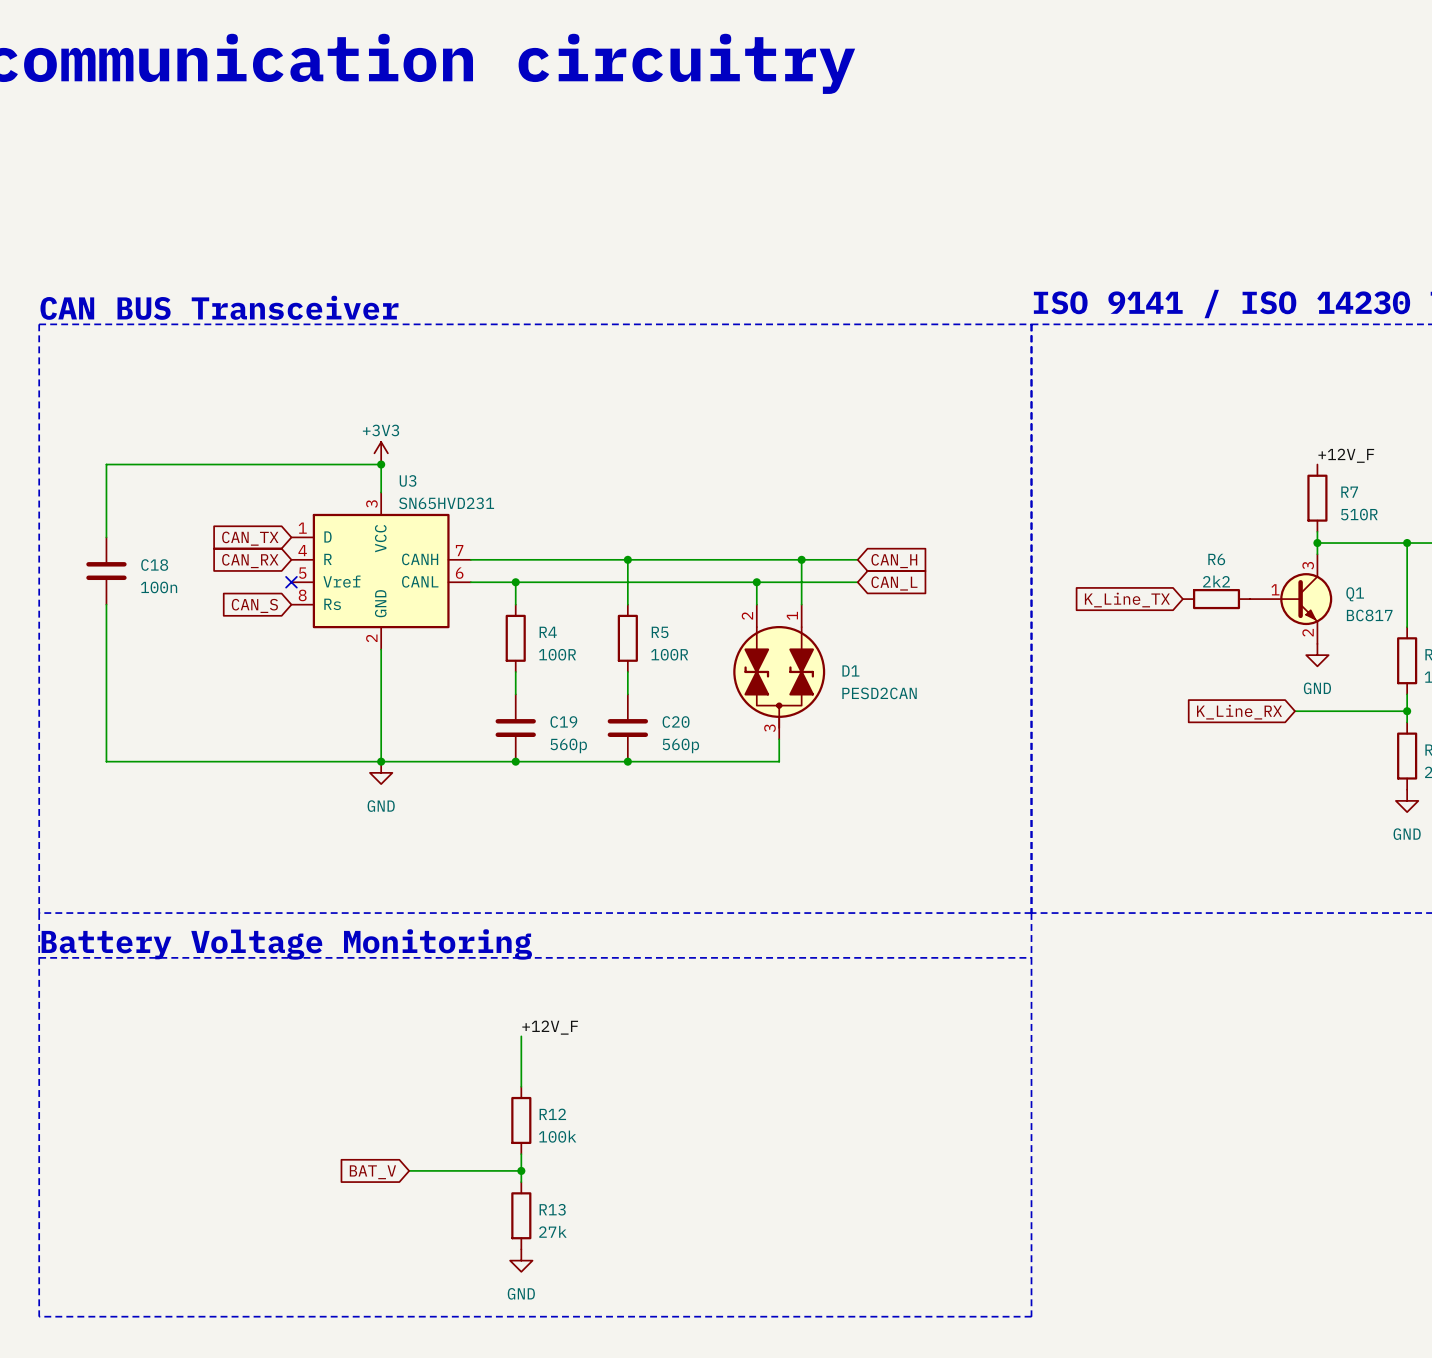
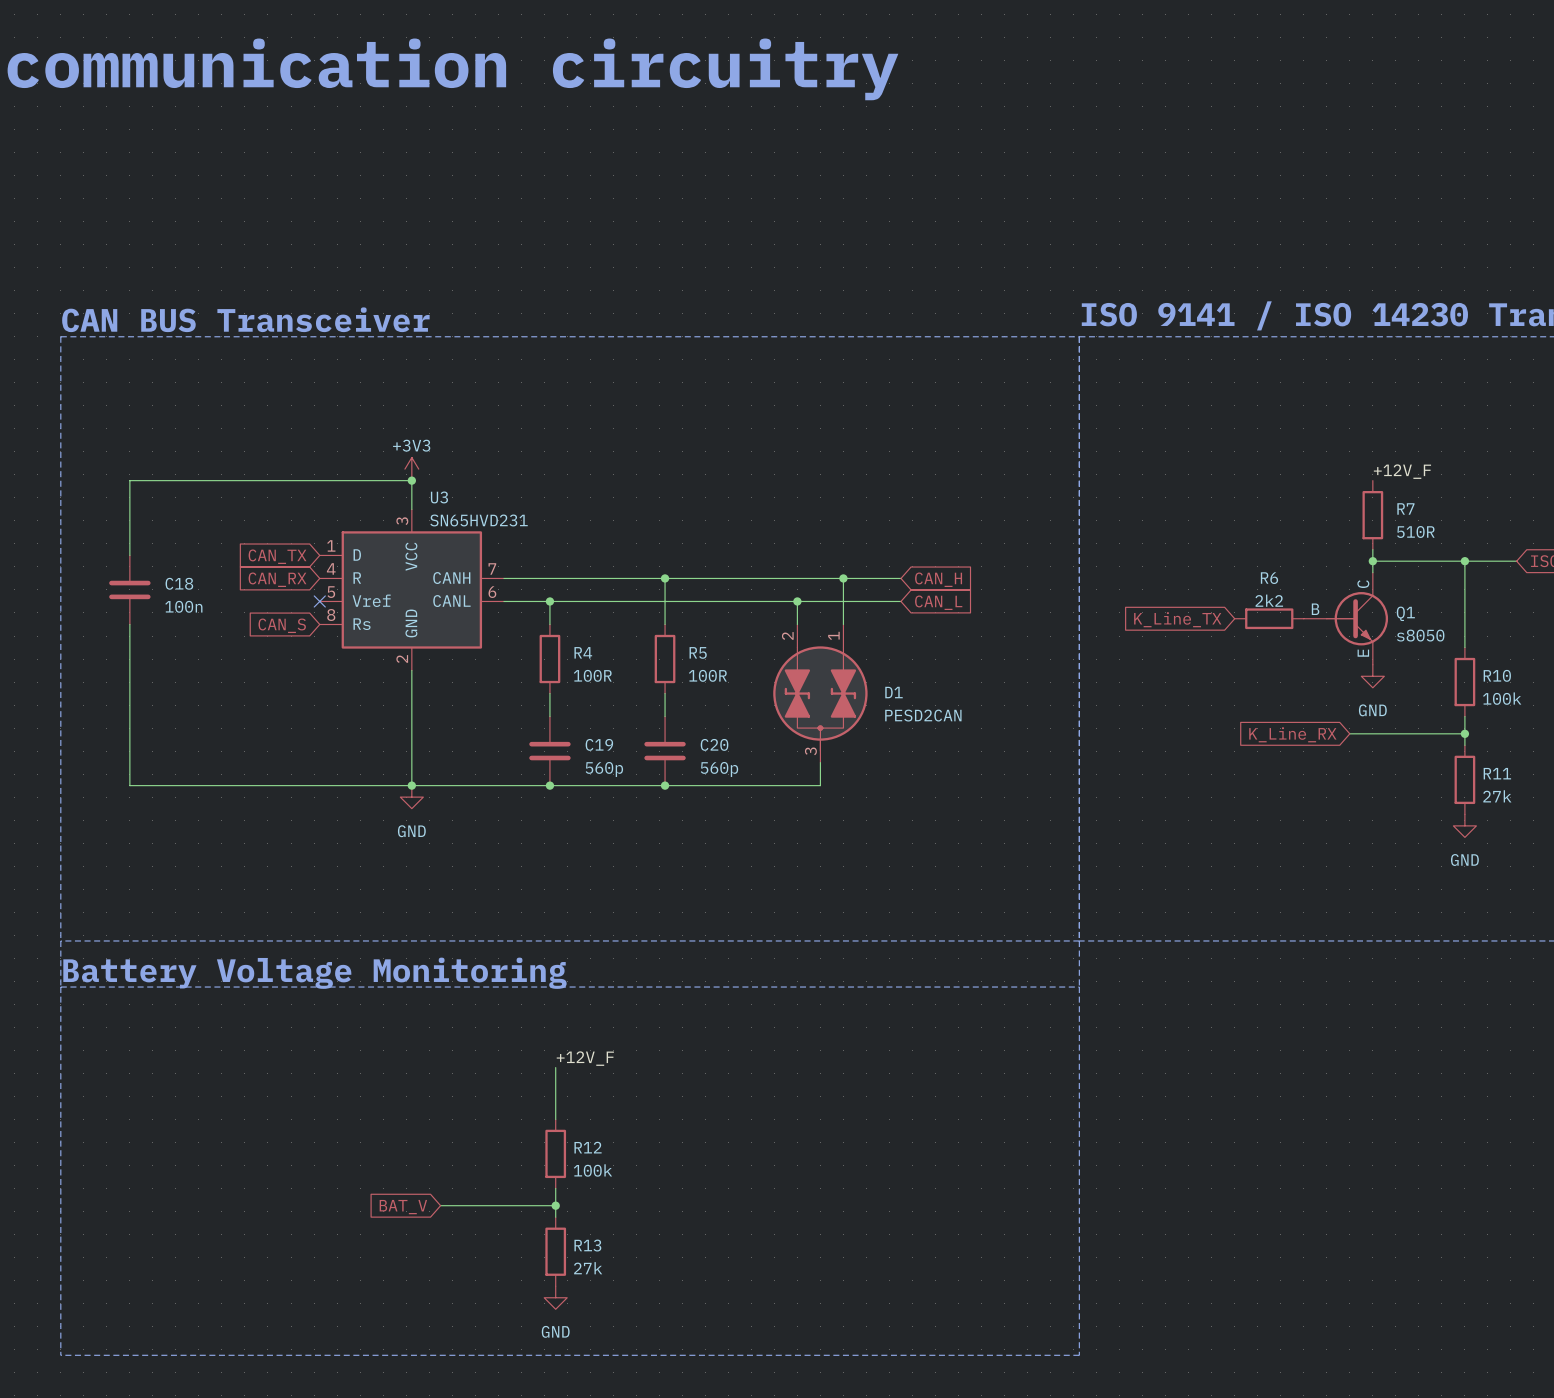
Q1 symbol: [1250, 554, 1333, 644] -> [1303, 572, 1389, 665]
Q1 value: BC817 (1369, 615) -> s8050 (1420, 635)

